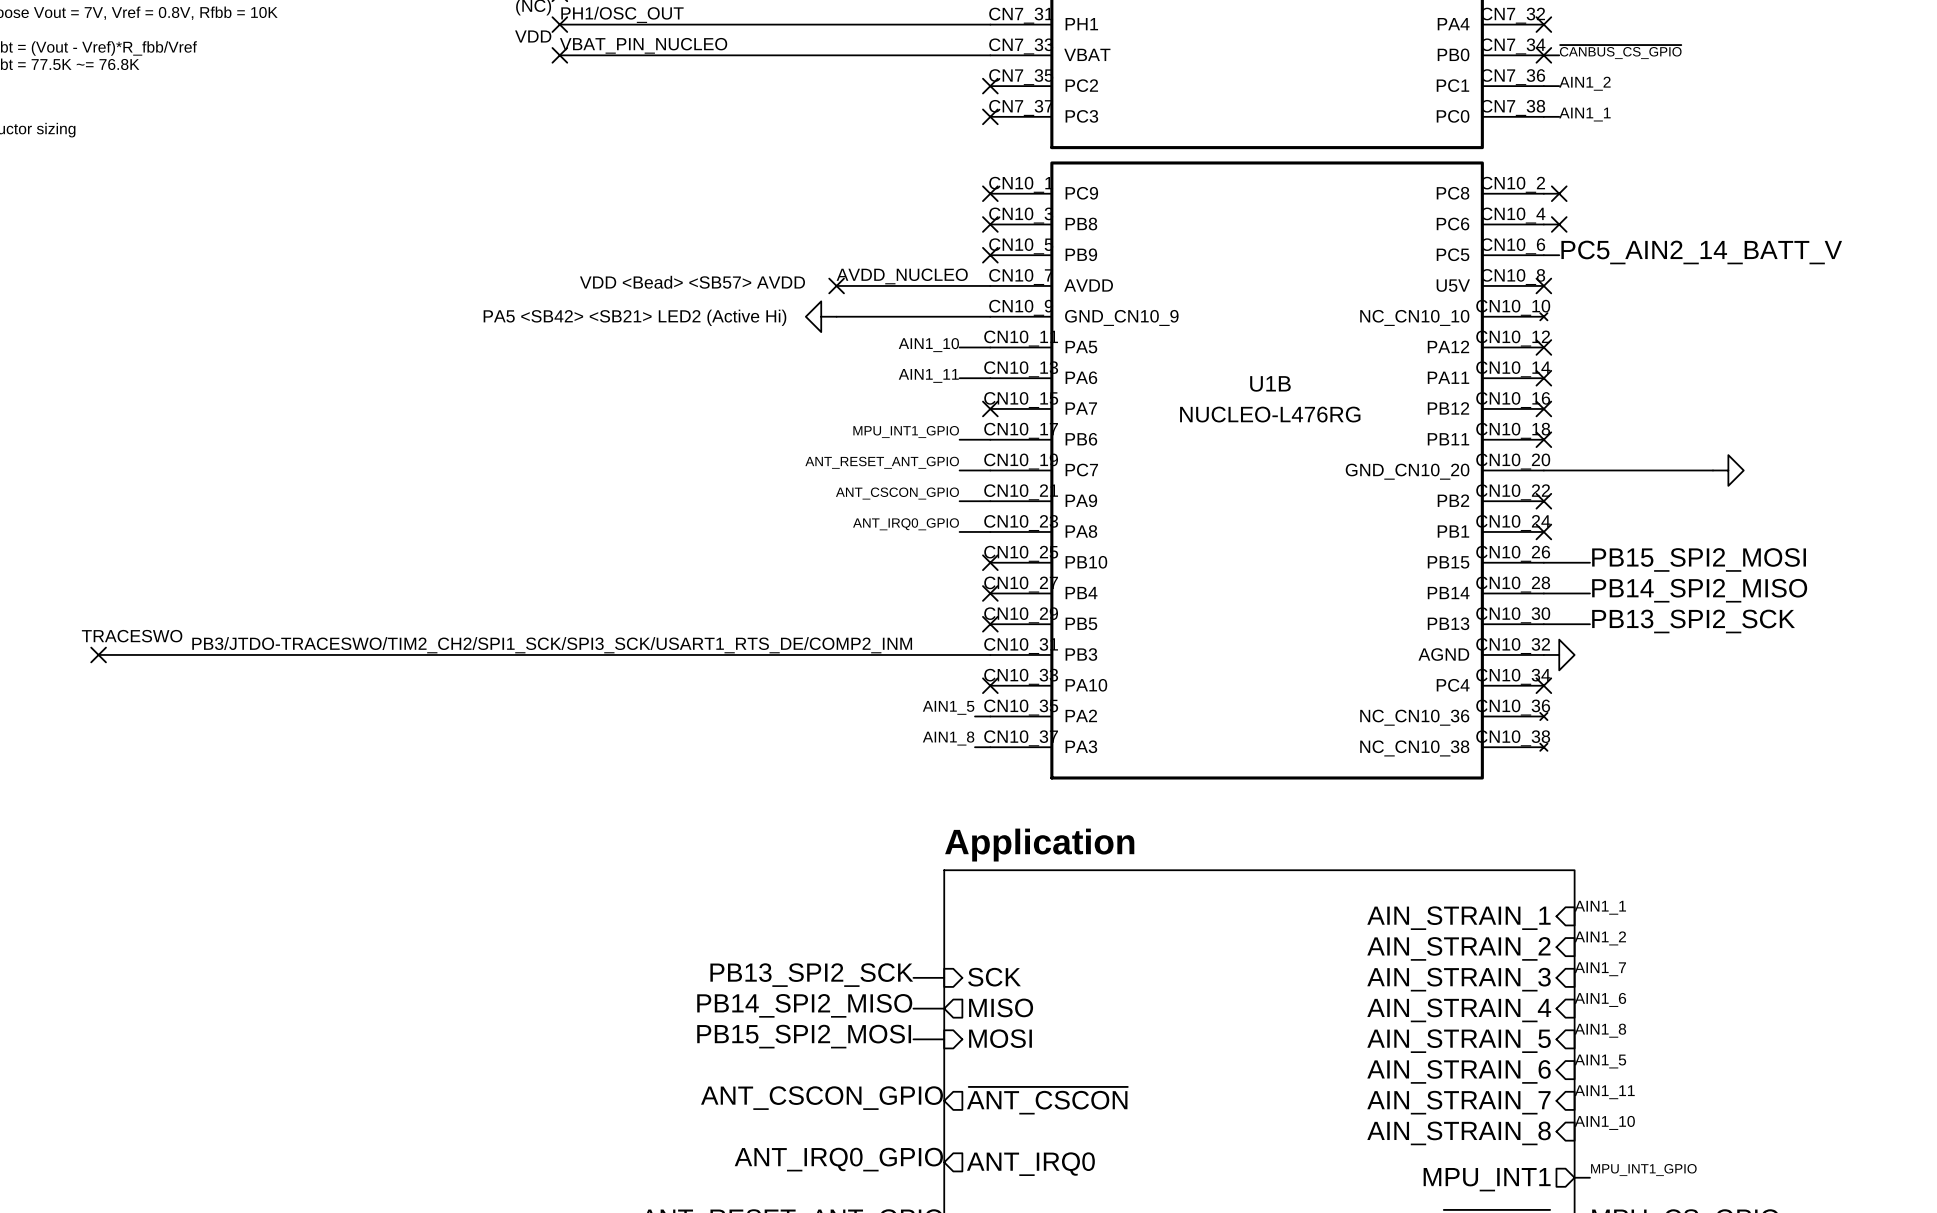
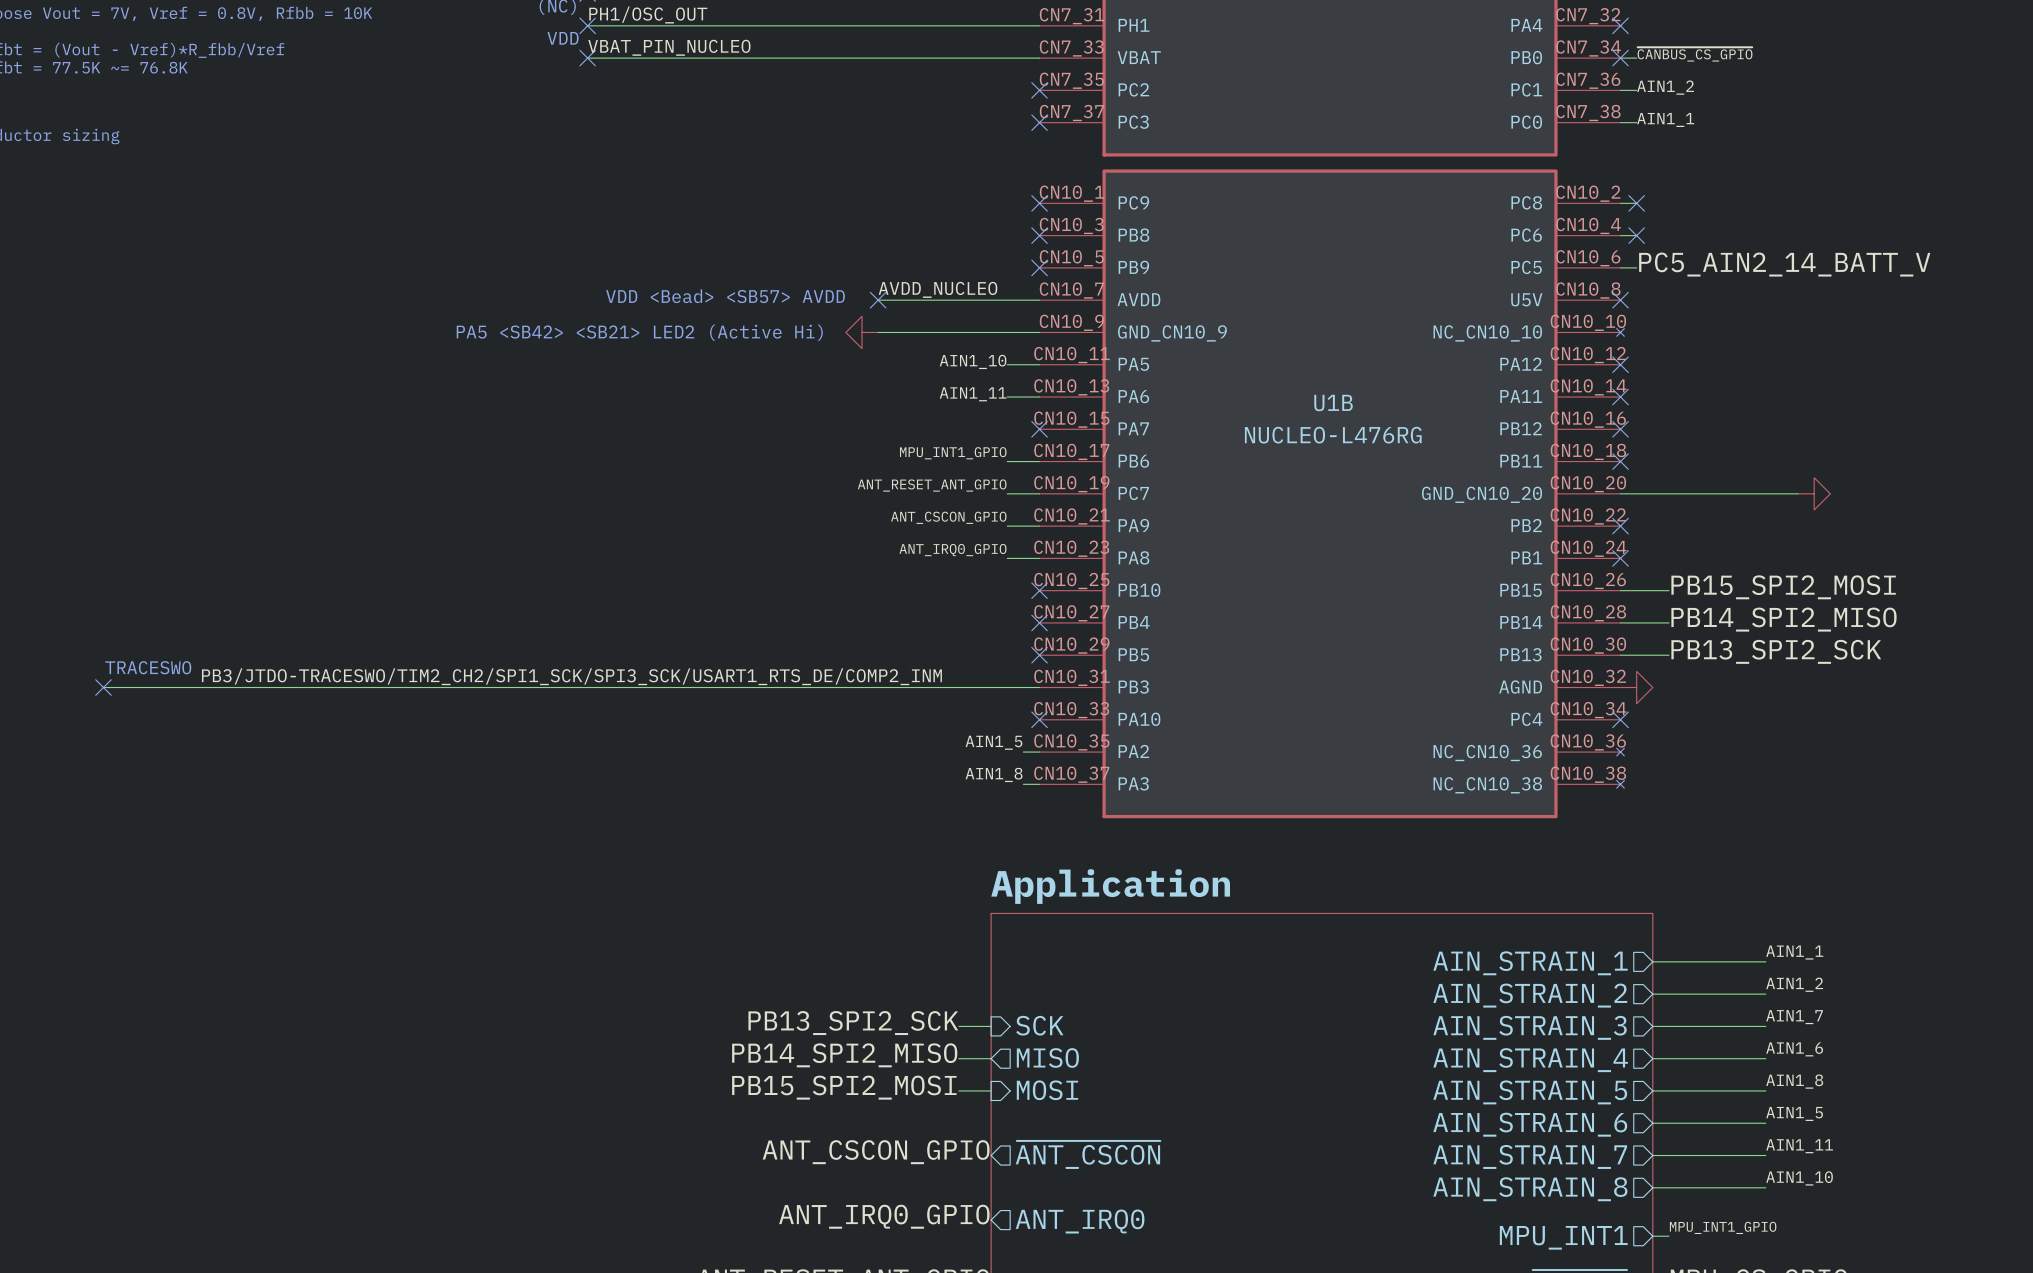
label position: AIN1_1 (1600, 907) -> AIN1_1 (1794, 952)
wire: none -> (1652, 961) (1765, 961)
sheet pin shape: input (1458, 918) -> output (1530, 963)
label position: AIN1_2 (1600, 938) -> AIN1_2 (1794, 984)
wire: none -> (1652, 994) (1765, 994)
sheet pin shape: input (1458, 948) -> output (1530, 995)
label position: AIN1_7 (1600, 969) -> AIN1_7 (1794, 1017)
wire: none -> (1652, 1026) (1765, 1026)
sheet pin shape: input (1459, 979) -> output (1530, 1027)
label position: AIN1_6 (1600, 999) -> AIN1_6 (1794, 1049)
wire: none -> (1652, 1058) (1765, 1058)
sheet pin shape: input (1459, 1010) -> output (1530, 1060)
label position: AIN1_8 (1600, 1030) -> AIN1_8 (1794, 1081)
wire: none -> (1652, 1090) (1765, 1090)
sheet pin shape: input (1459, 1041) -> output (1530, 1092)
label position: AIN1_5 (1600, 1061) -> AIN1_5 (1794, 1113)
wire: none -> (1652, 1123) (1765, 1123)
sheet pin shape: input (1459, 1071) -> output (1530, 1124)
label position: AIN1_11 (1604, 1092) -> AIN1_11 (1799, 1146)
wire: none -> (1652, 1155) (1765, 1155)
sheet pin shape: input (1458, 1102) -> output (1530, 1156)
label position: AIN1_10 (1604, 1122) -> AIN1_10 (1799, 1178)
wire: none -> (1652, 1187) (1765, 1187)
sheet pin shape: input (1459, 1133) -> output (1530, 1189)

